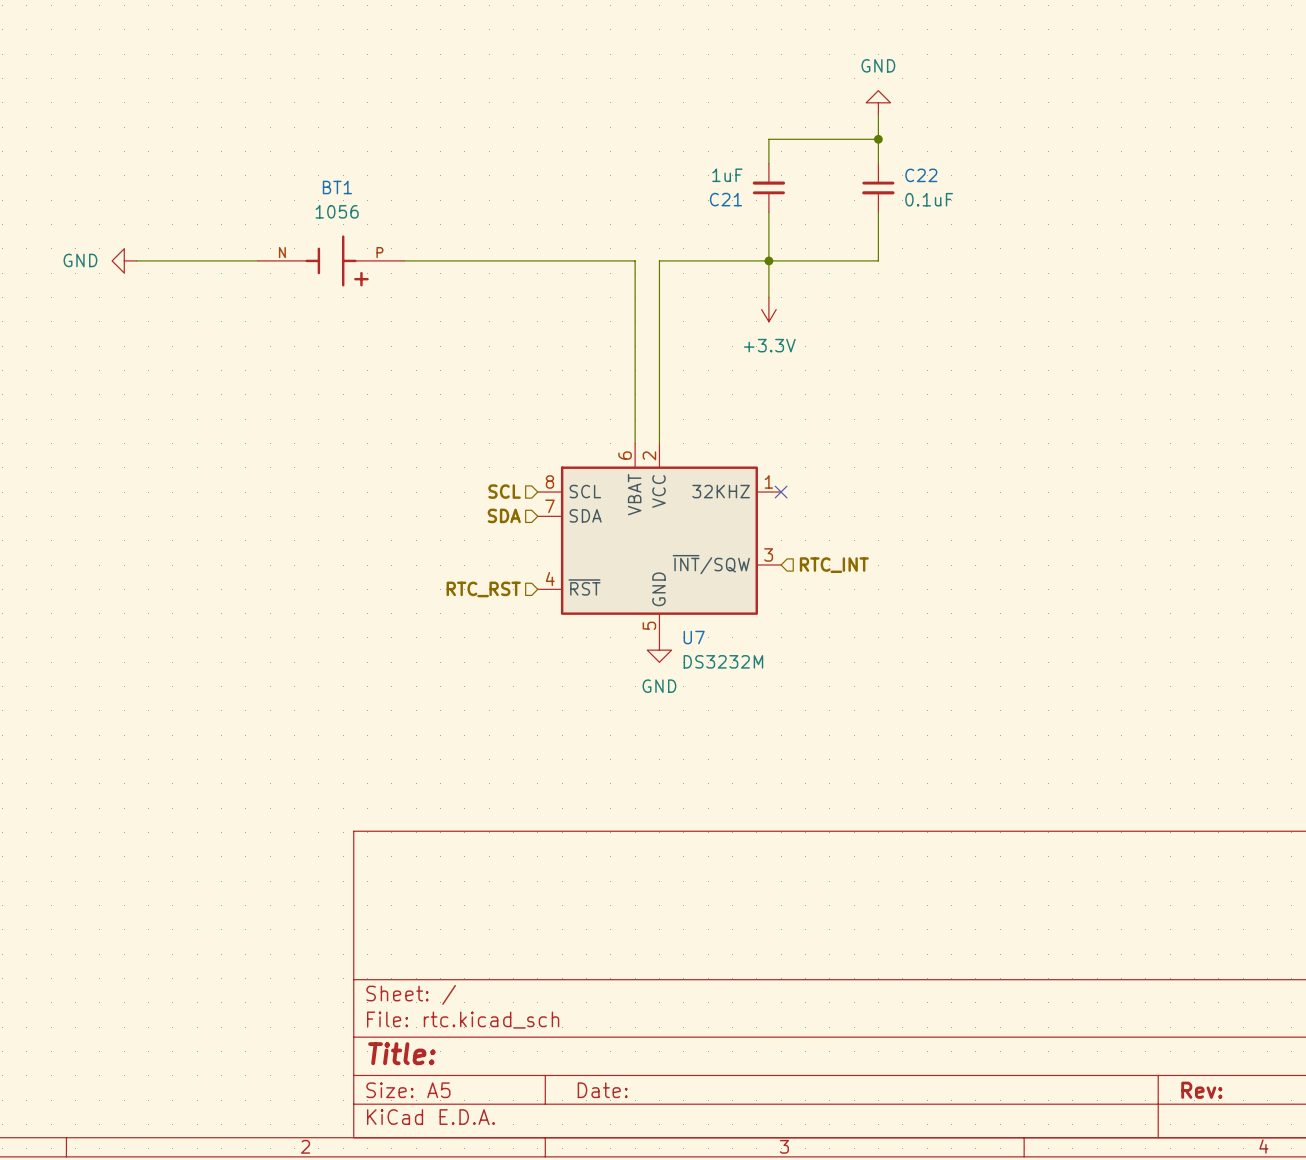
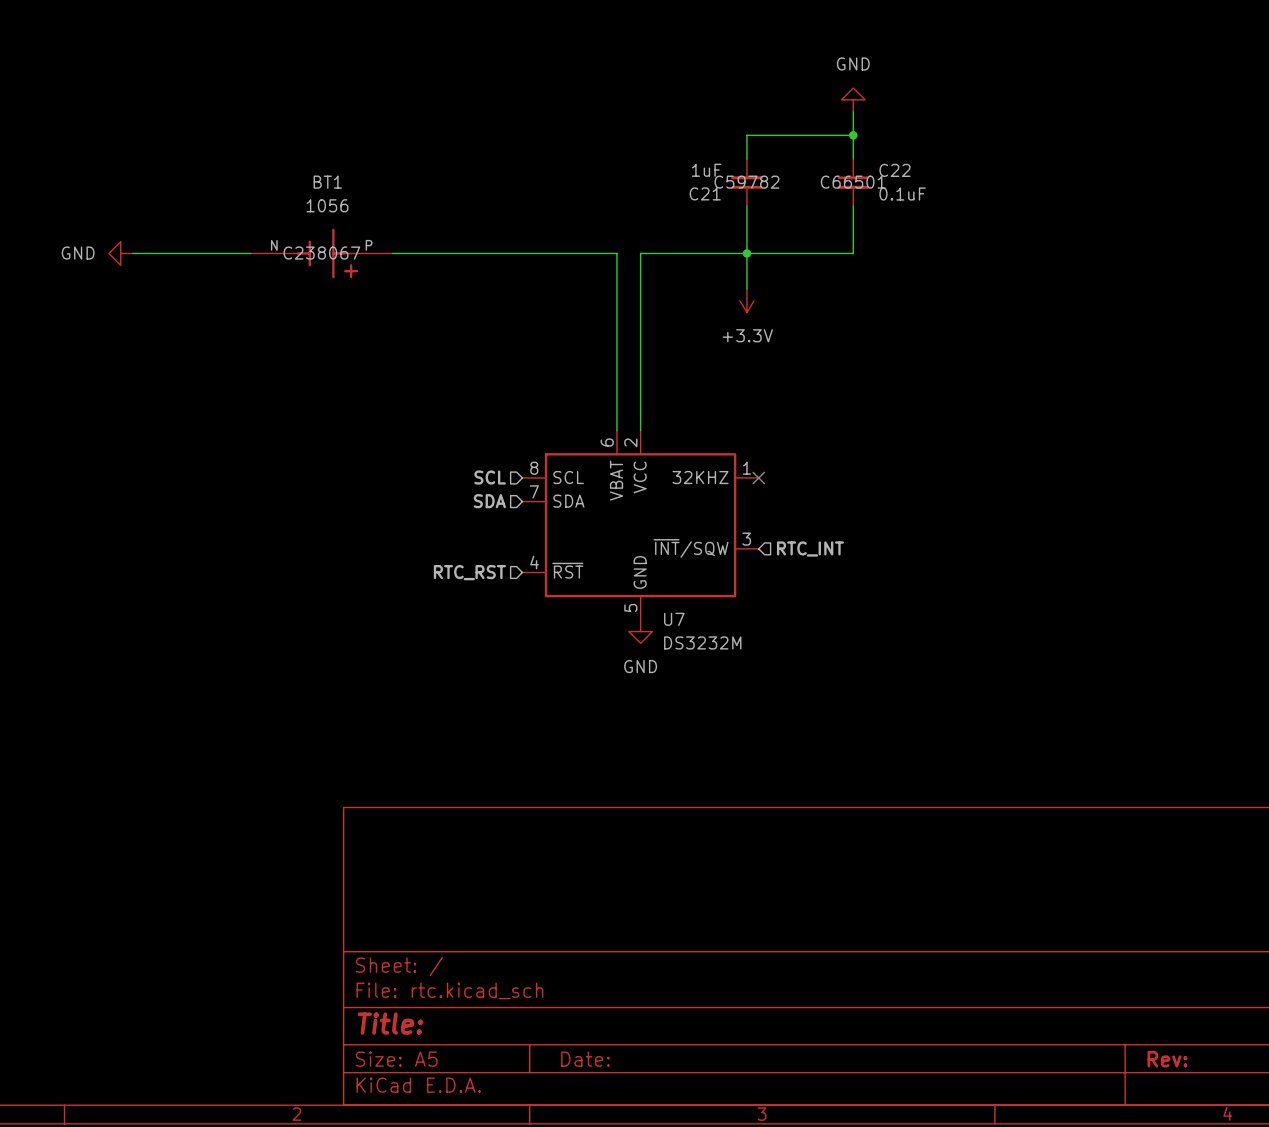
C21 text: none -> C59782 (746, 182)
C22 text: none -> C66501 (853, 182)
BT1 text: none -> C238067 (321, 253)

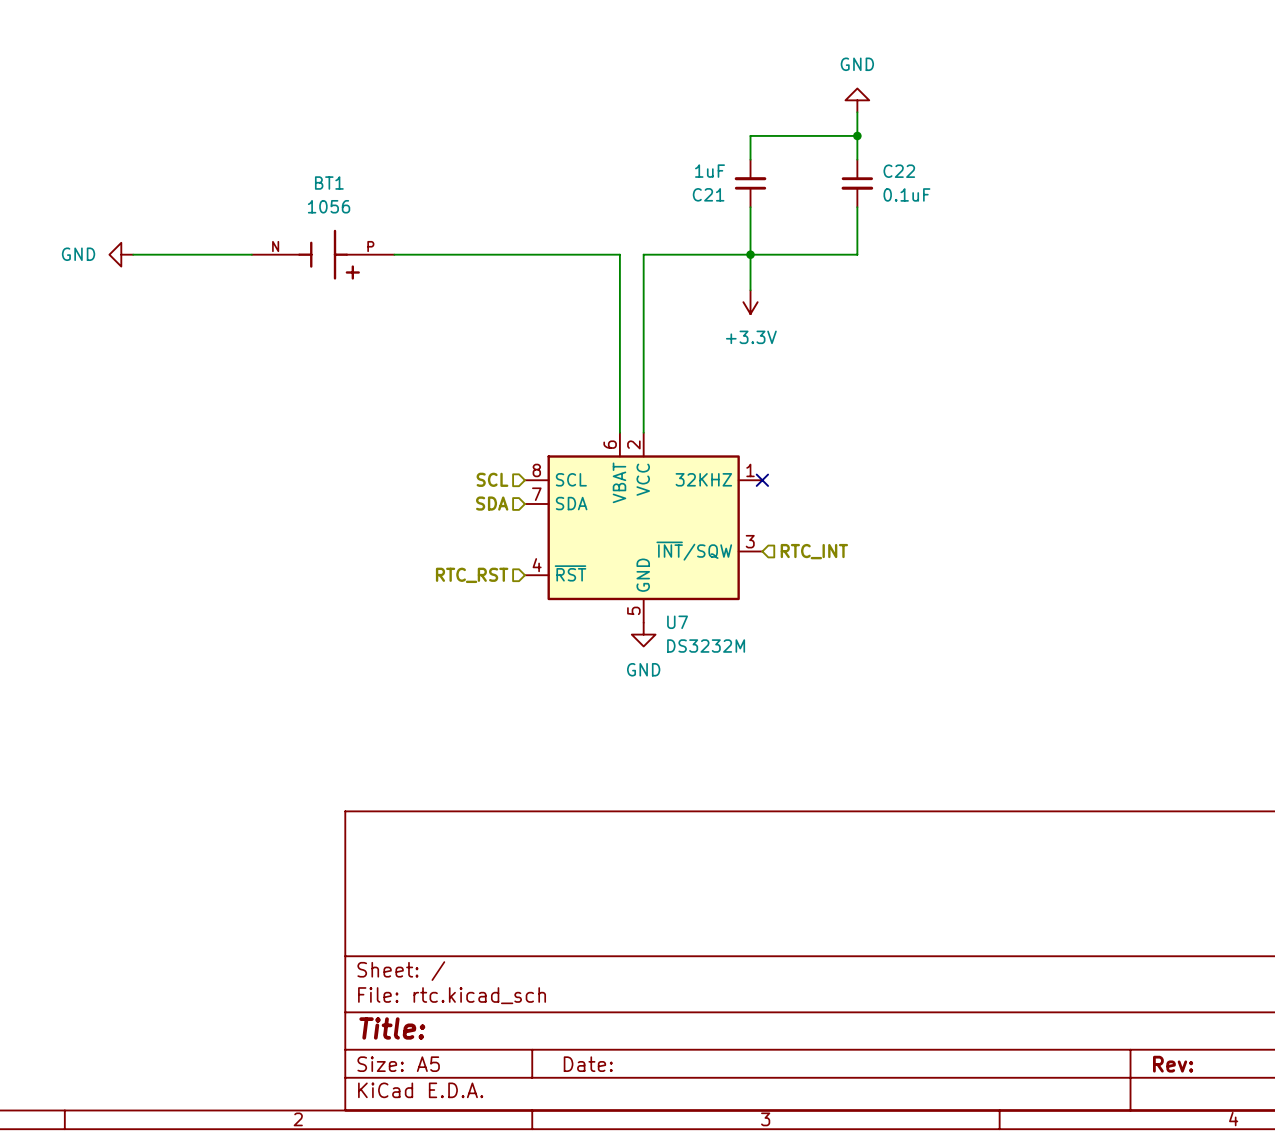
C21 text: C59782 (746, 182) -> none
C22 text: C66501 (853, 182) -> none
BT1 text: C238067 (321, 253) -> none

